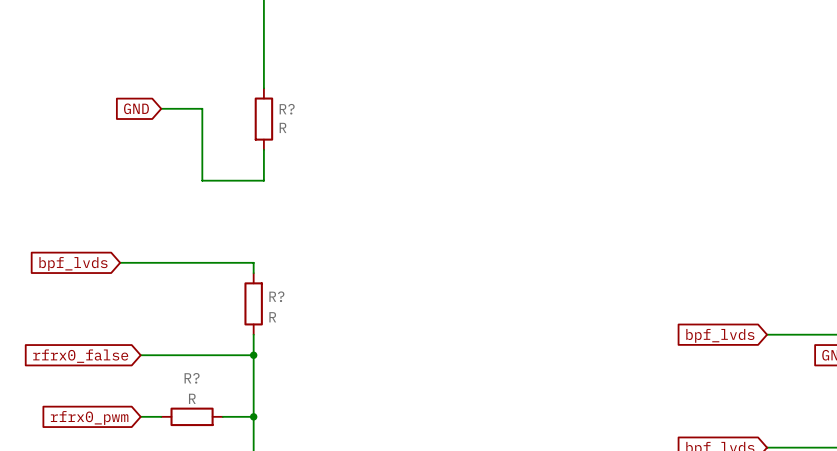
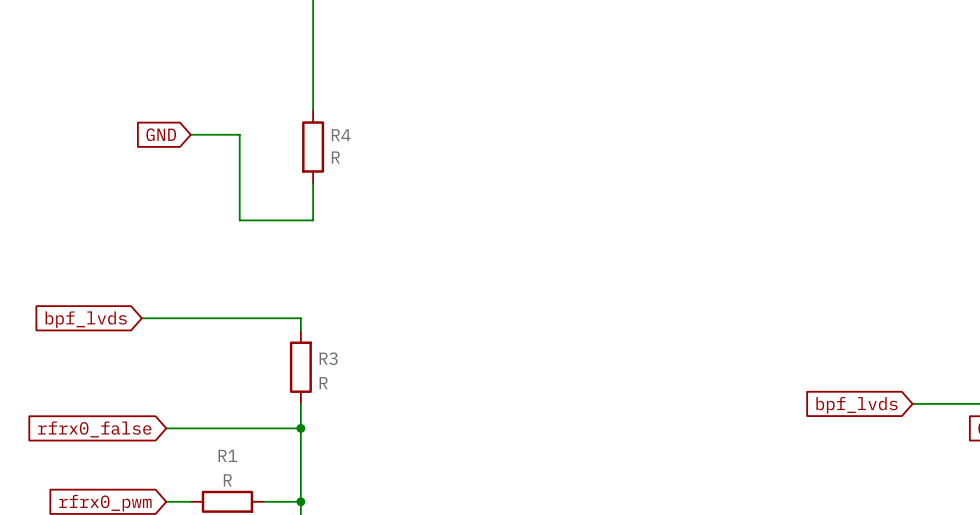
R? name: R? (287, 109) -> R4 (341, 135)
R? name: R? (276, 296) -> R3 (328, 358)
R? name: R? (192, 378) -> R1 (227, 455)

